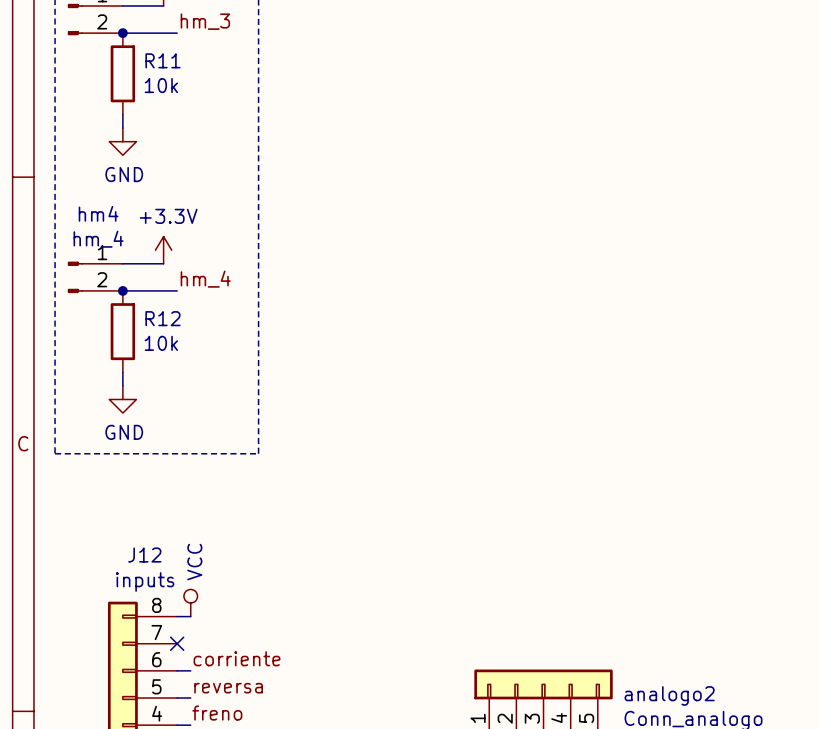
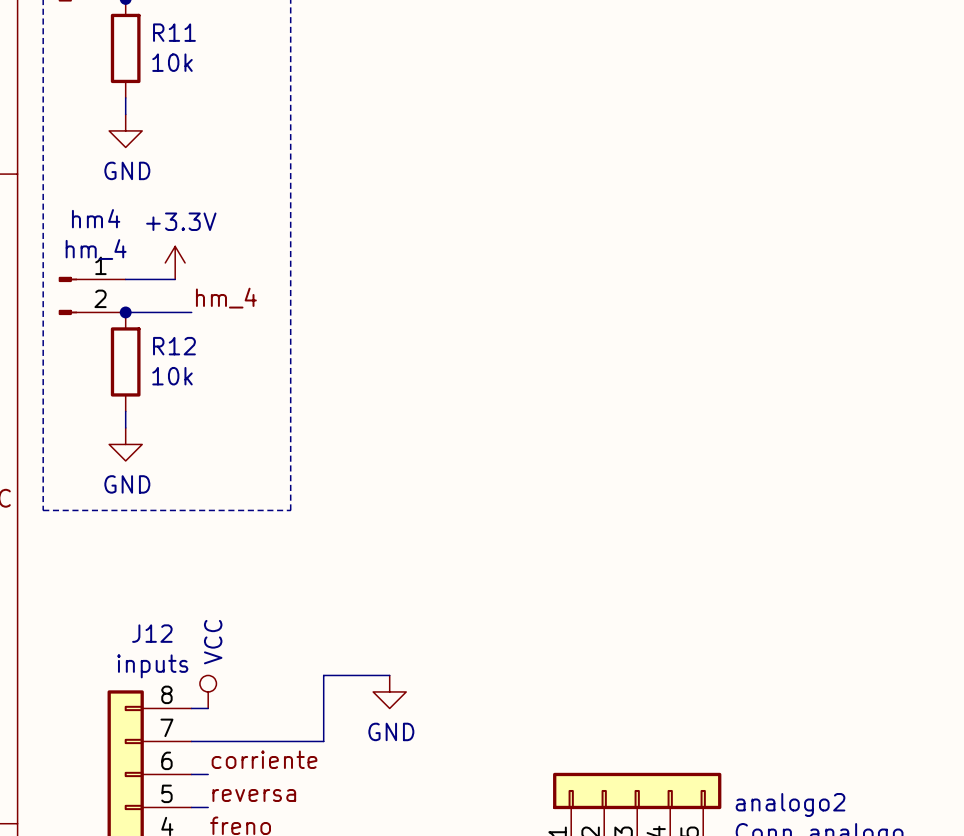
wire: none -> (389, 675) (323, 675) (323, 741) (191, 741)
power symbol: none -> GND (389, 691)
no-connect mark: (177, 643) -> none

